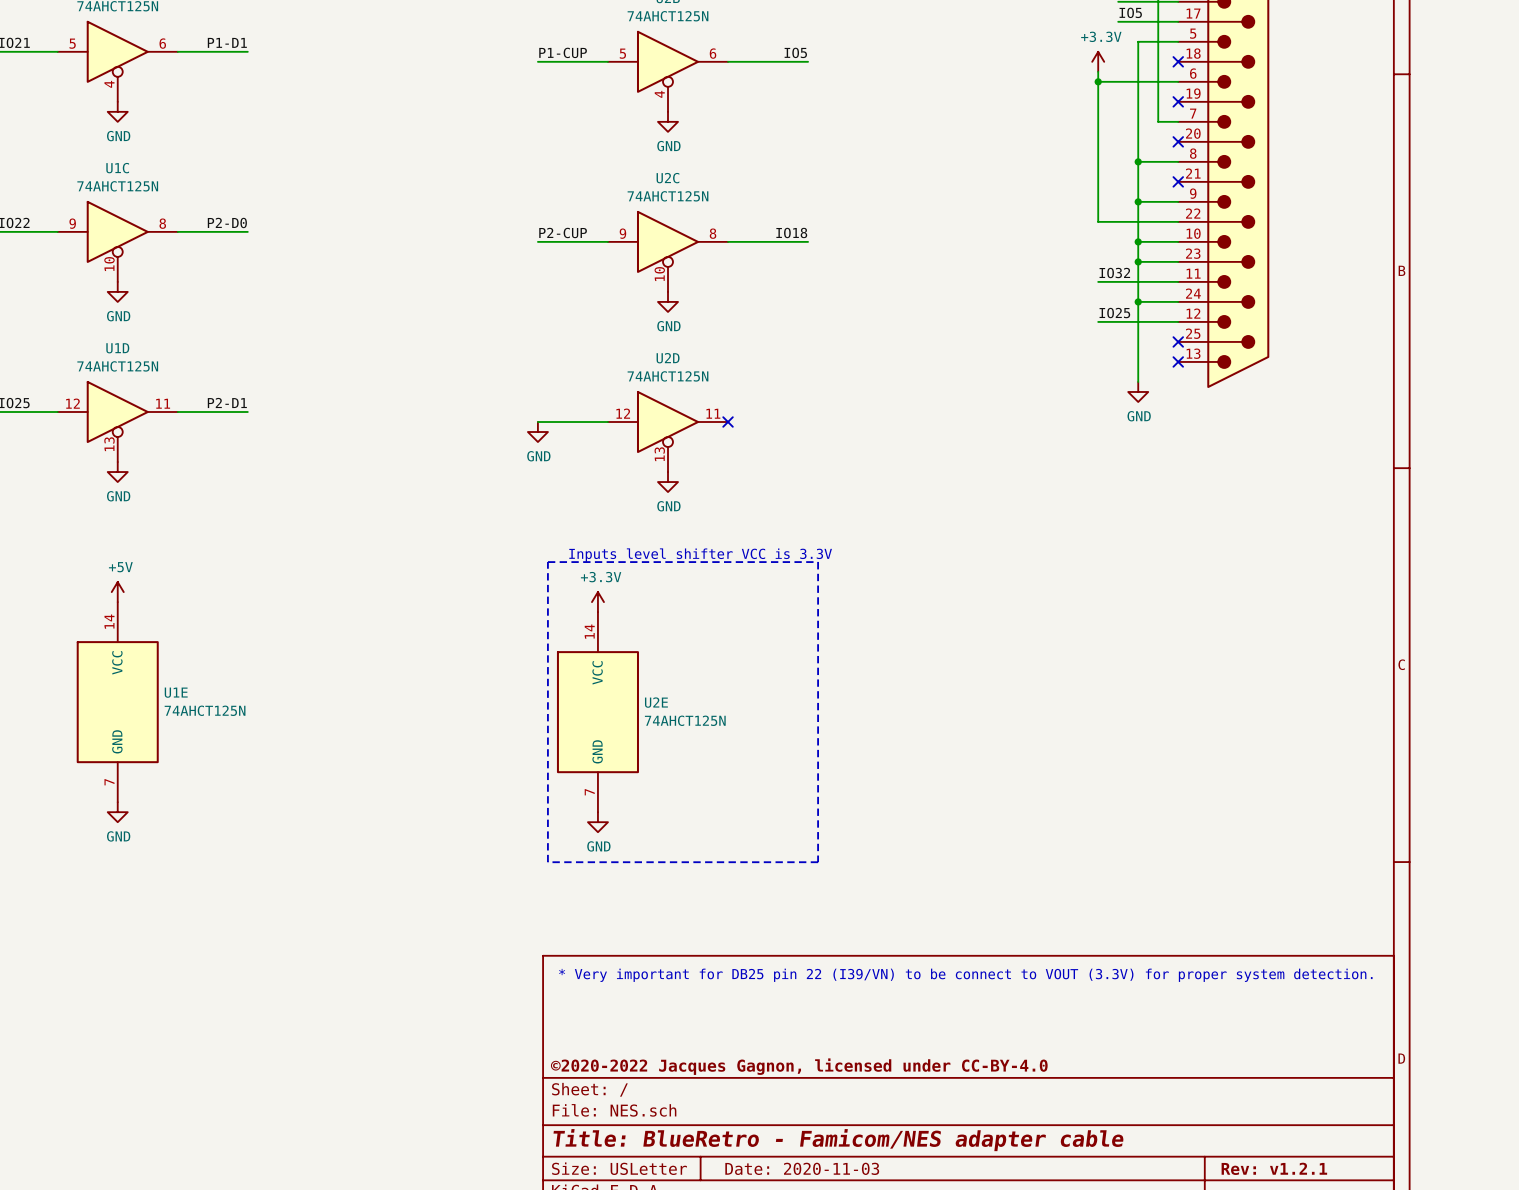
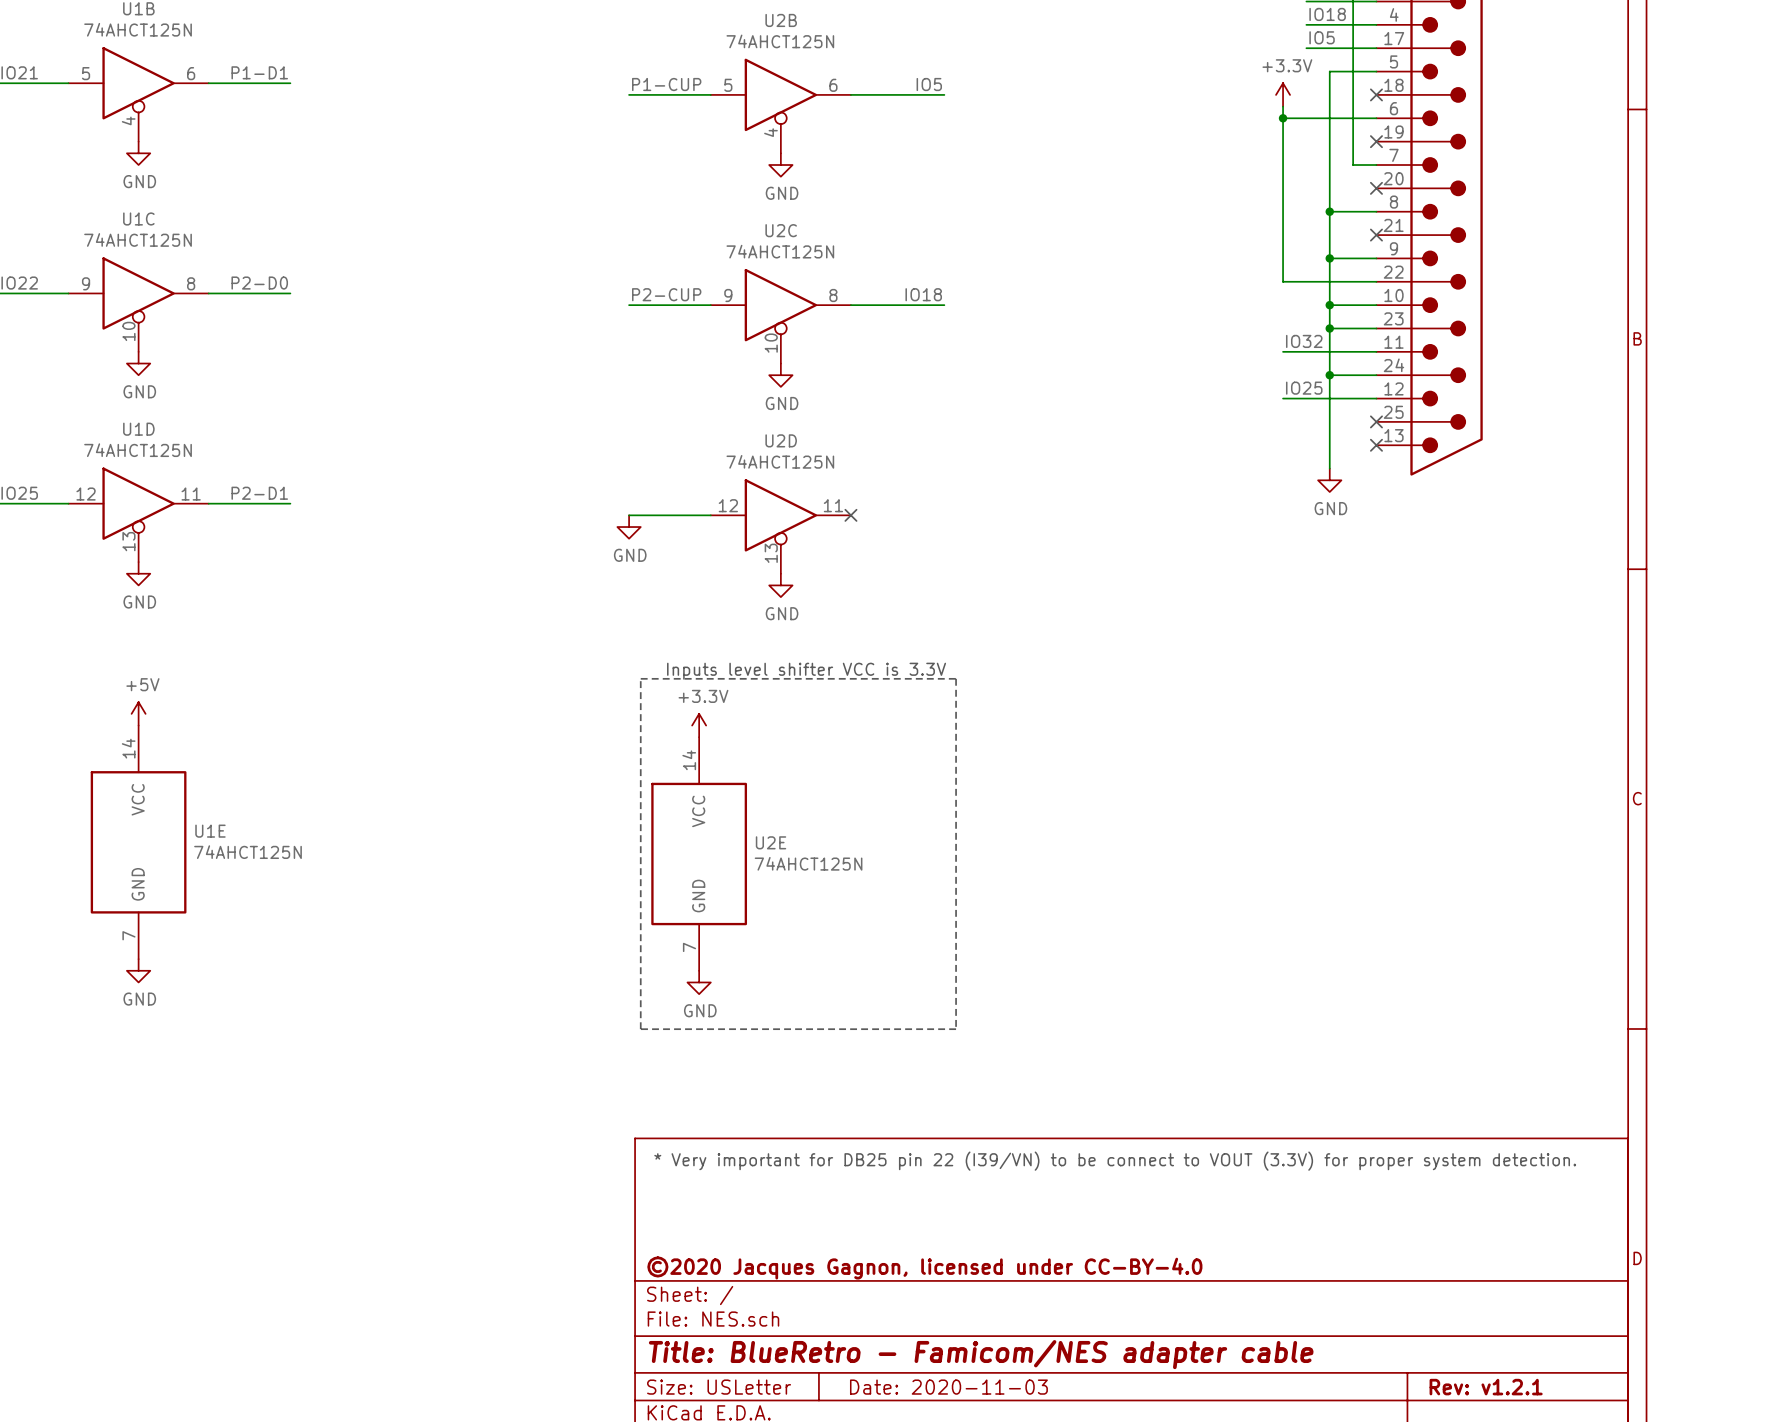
title block: ©2020-2022 Jacques Gagnon, licensed under CC-BY-4.0 (799, 1066) -> ©2020 Jacques Gagnon, licensed under CC-BY-4.0 (924, 1267)

